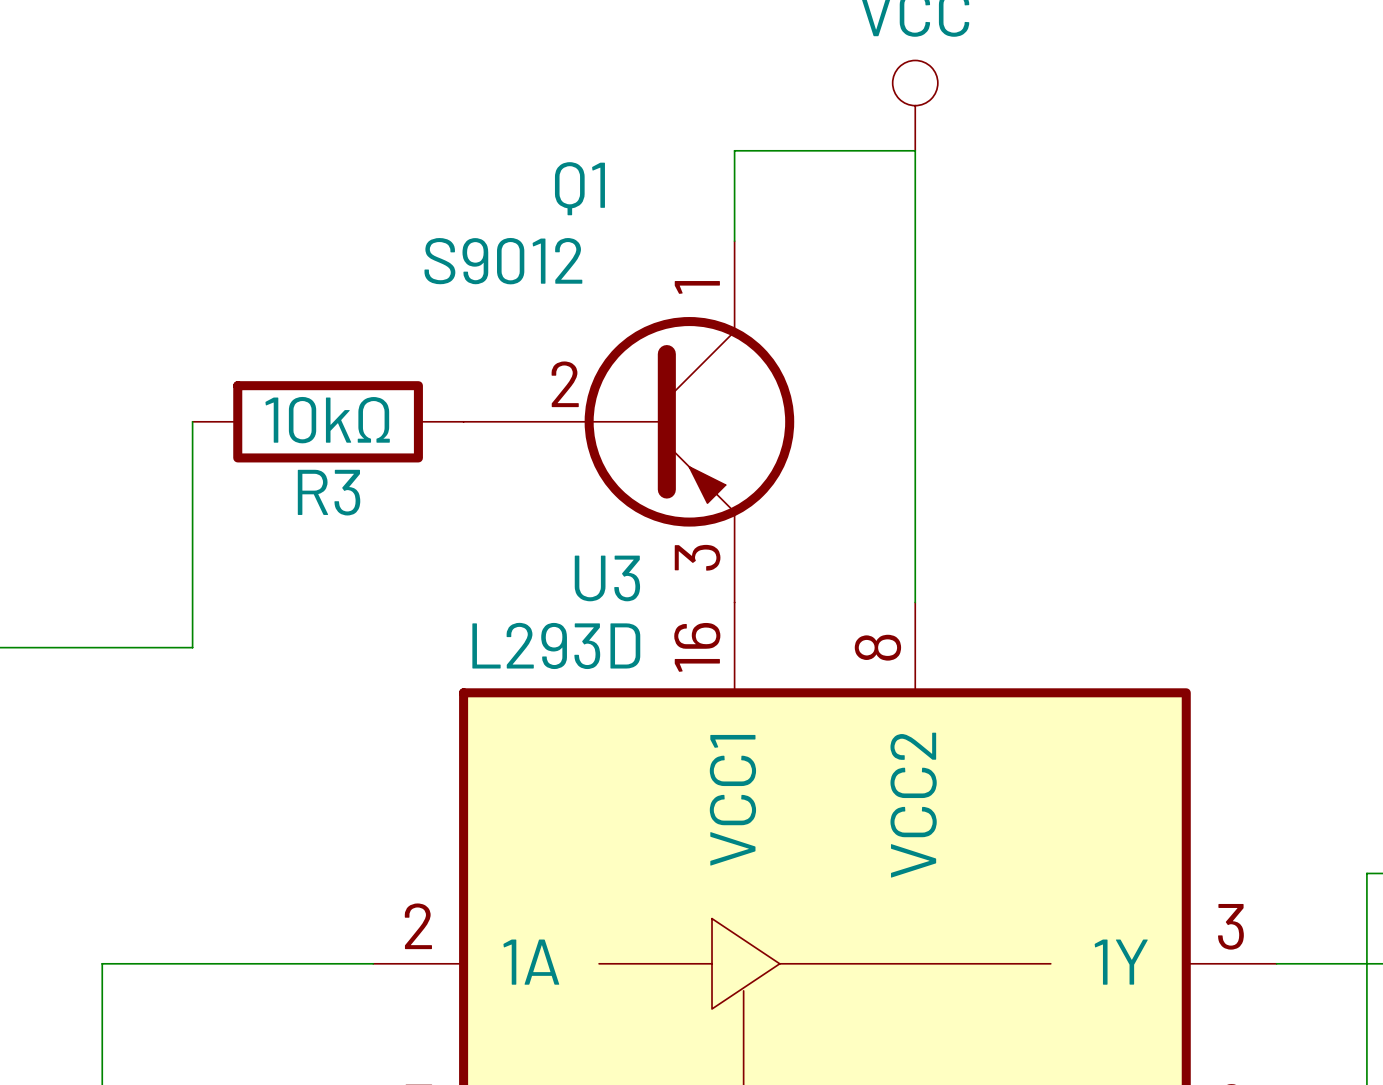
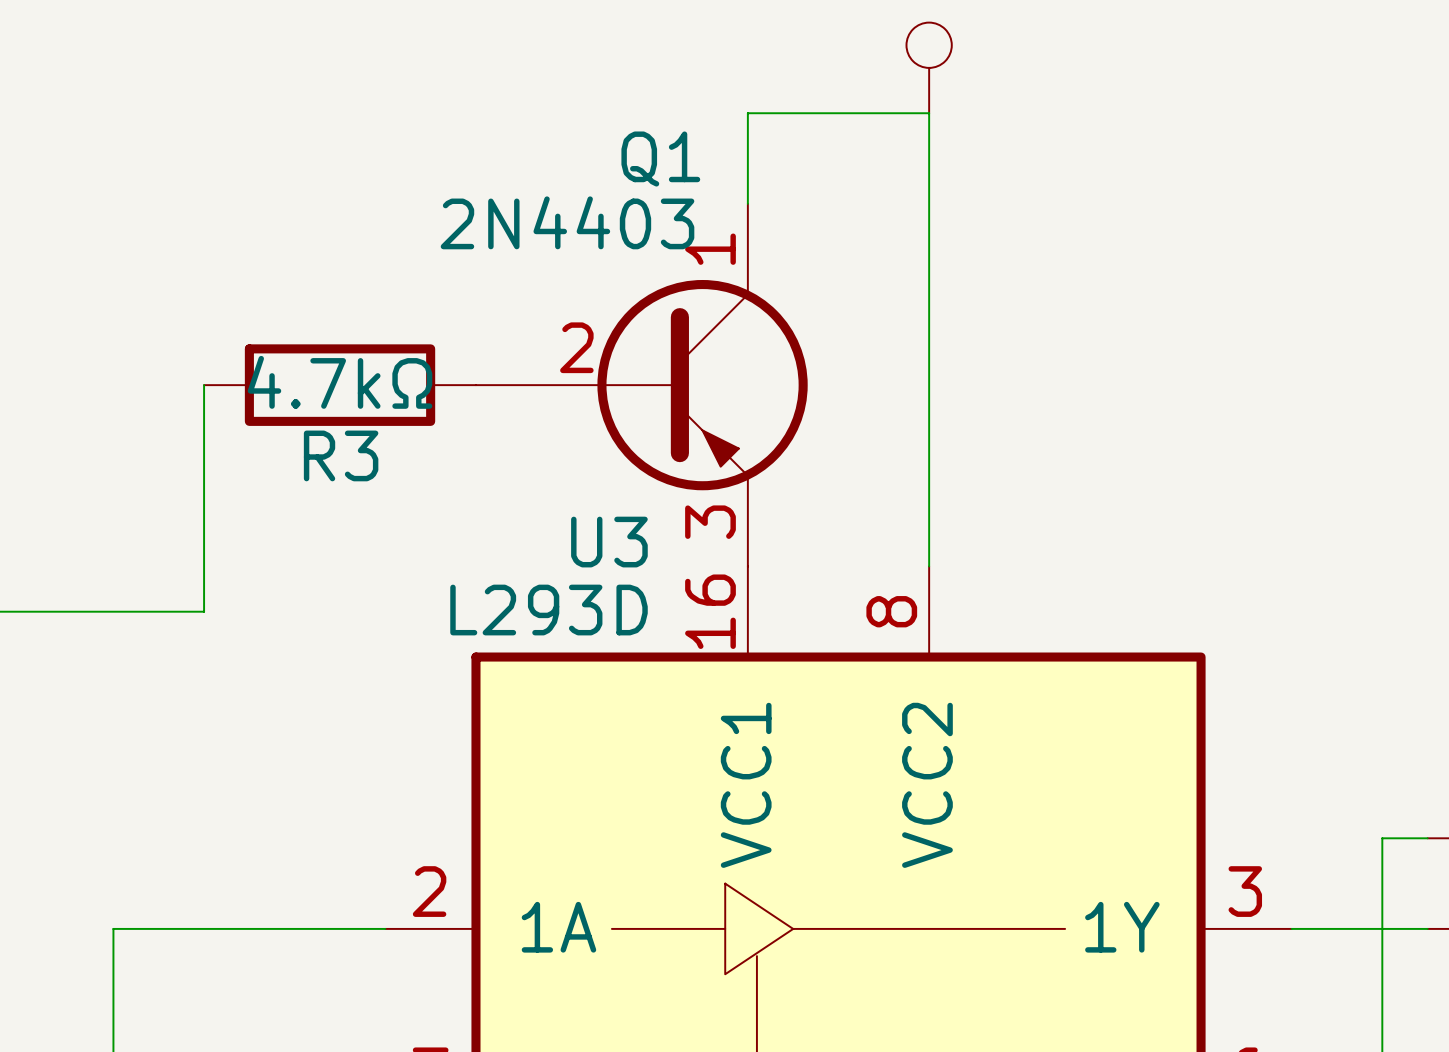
Q1 name position: Q1 (579, 188) -> Q1 (660, 159)
Q1 value: S9012 (503, 261) -> 2N4403 (567, 222)
R3 value: 10kΩ (327, 420) -> 4.7kΩ (340, 382)

